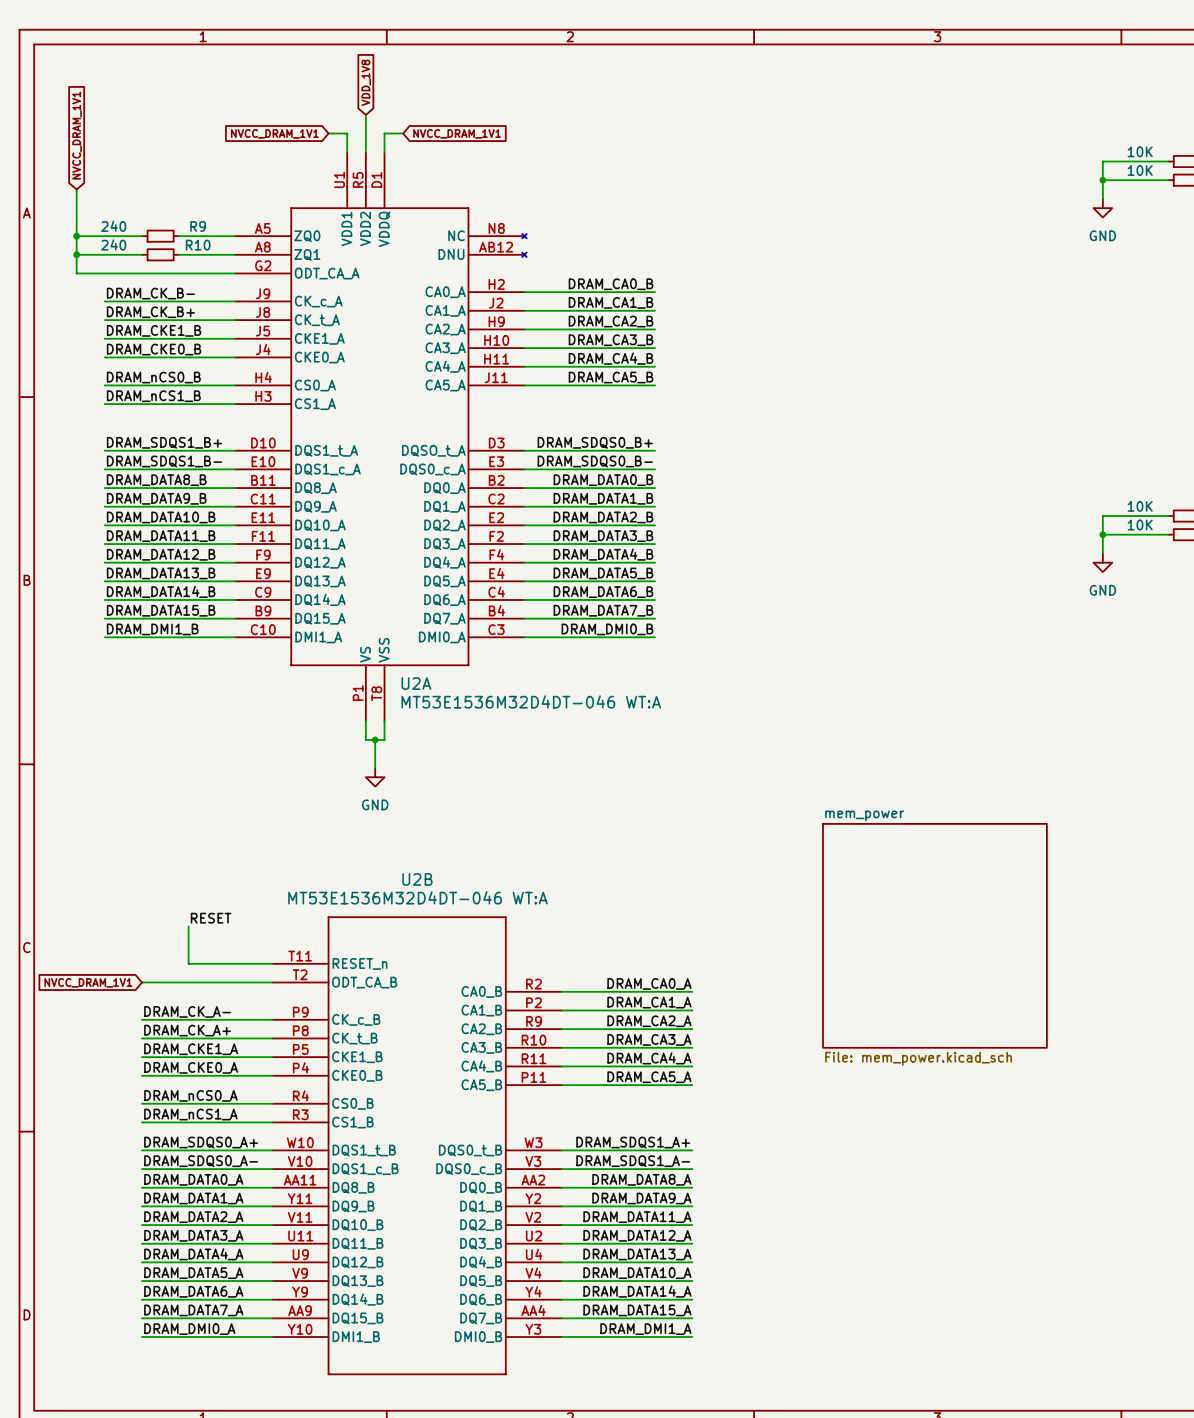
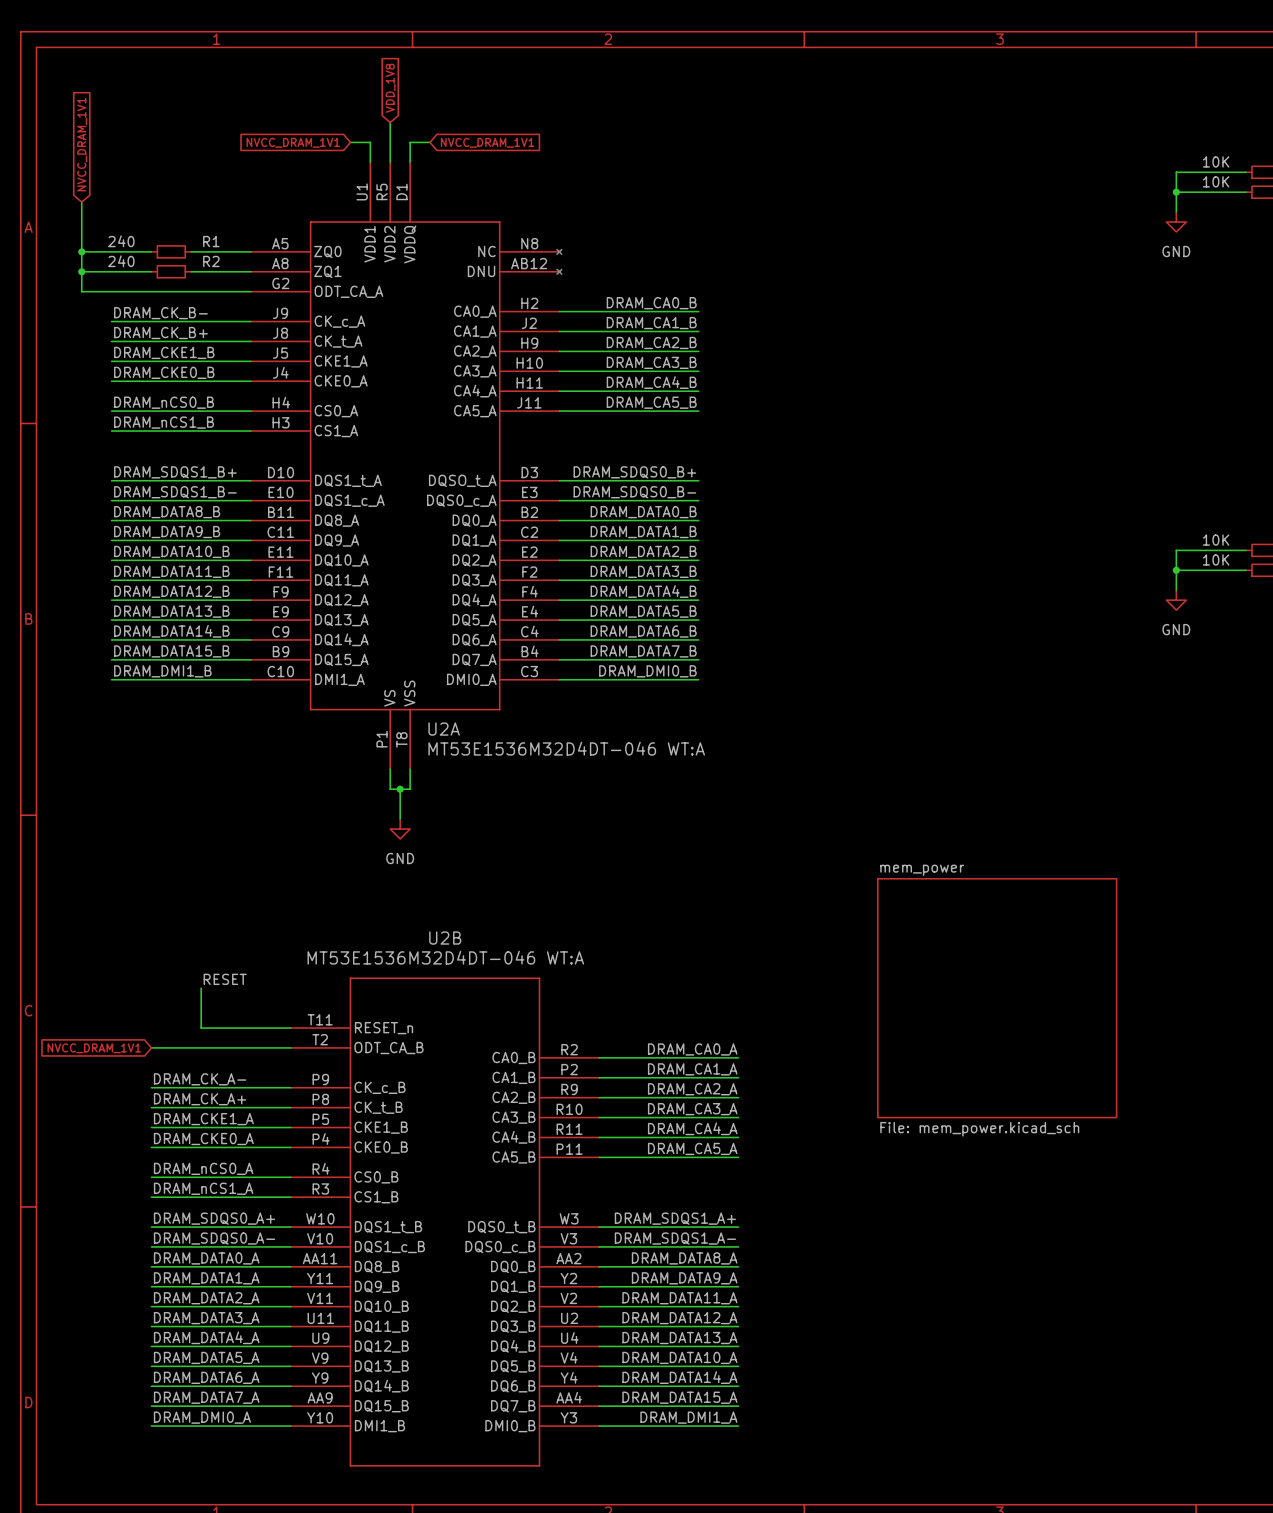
R9 name: R9 (198, 226) -> R1 (211, 241)
R10 name: R10 (198, 245) -> R2 (211, 261)

